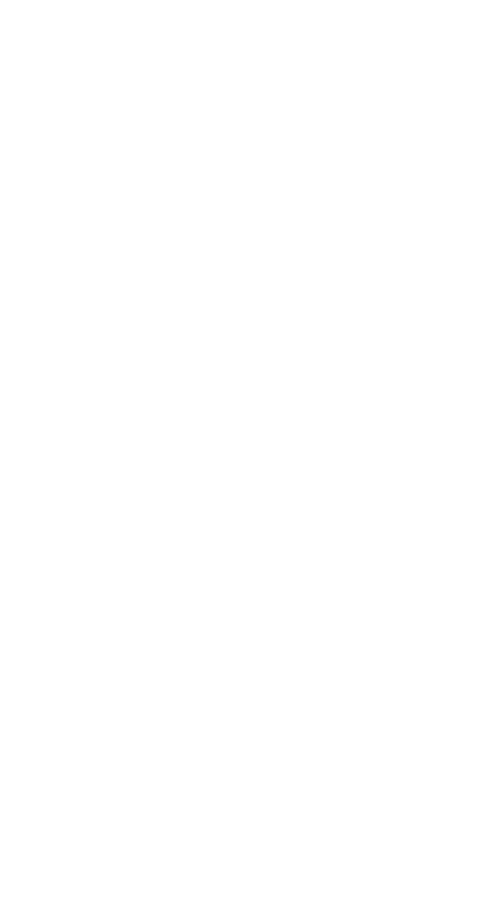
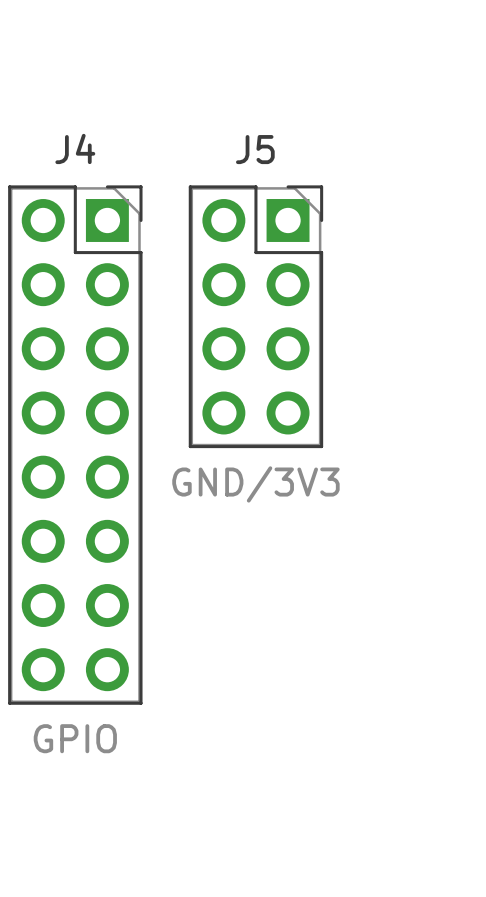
J5: none -> GND/3V3 (255, 316)
J4: none -> GPIO (75, 445)

